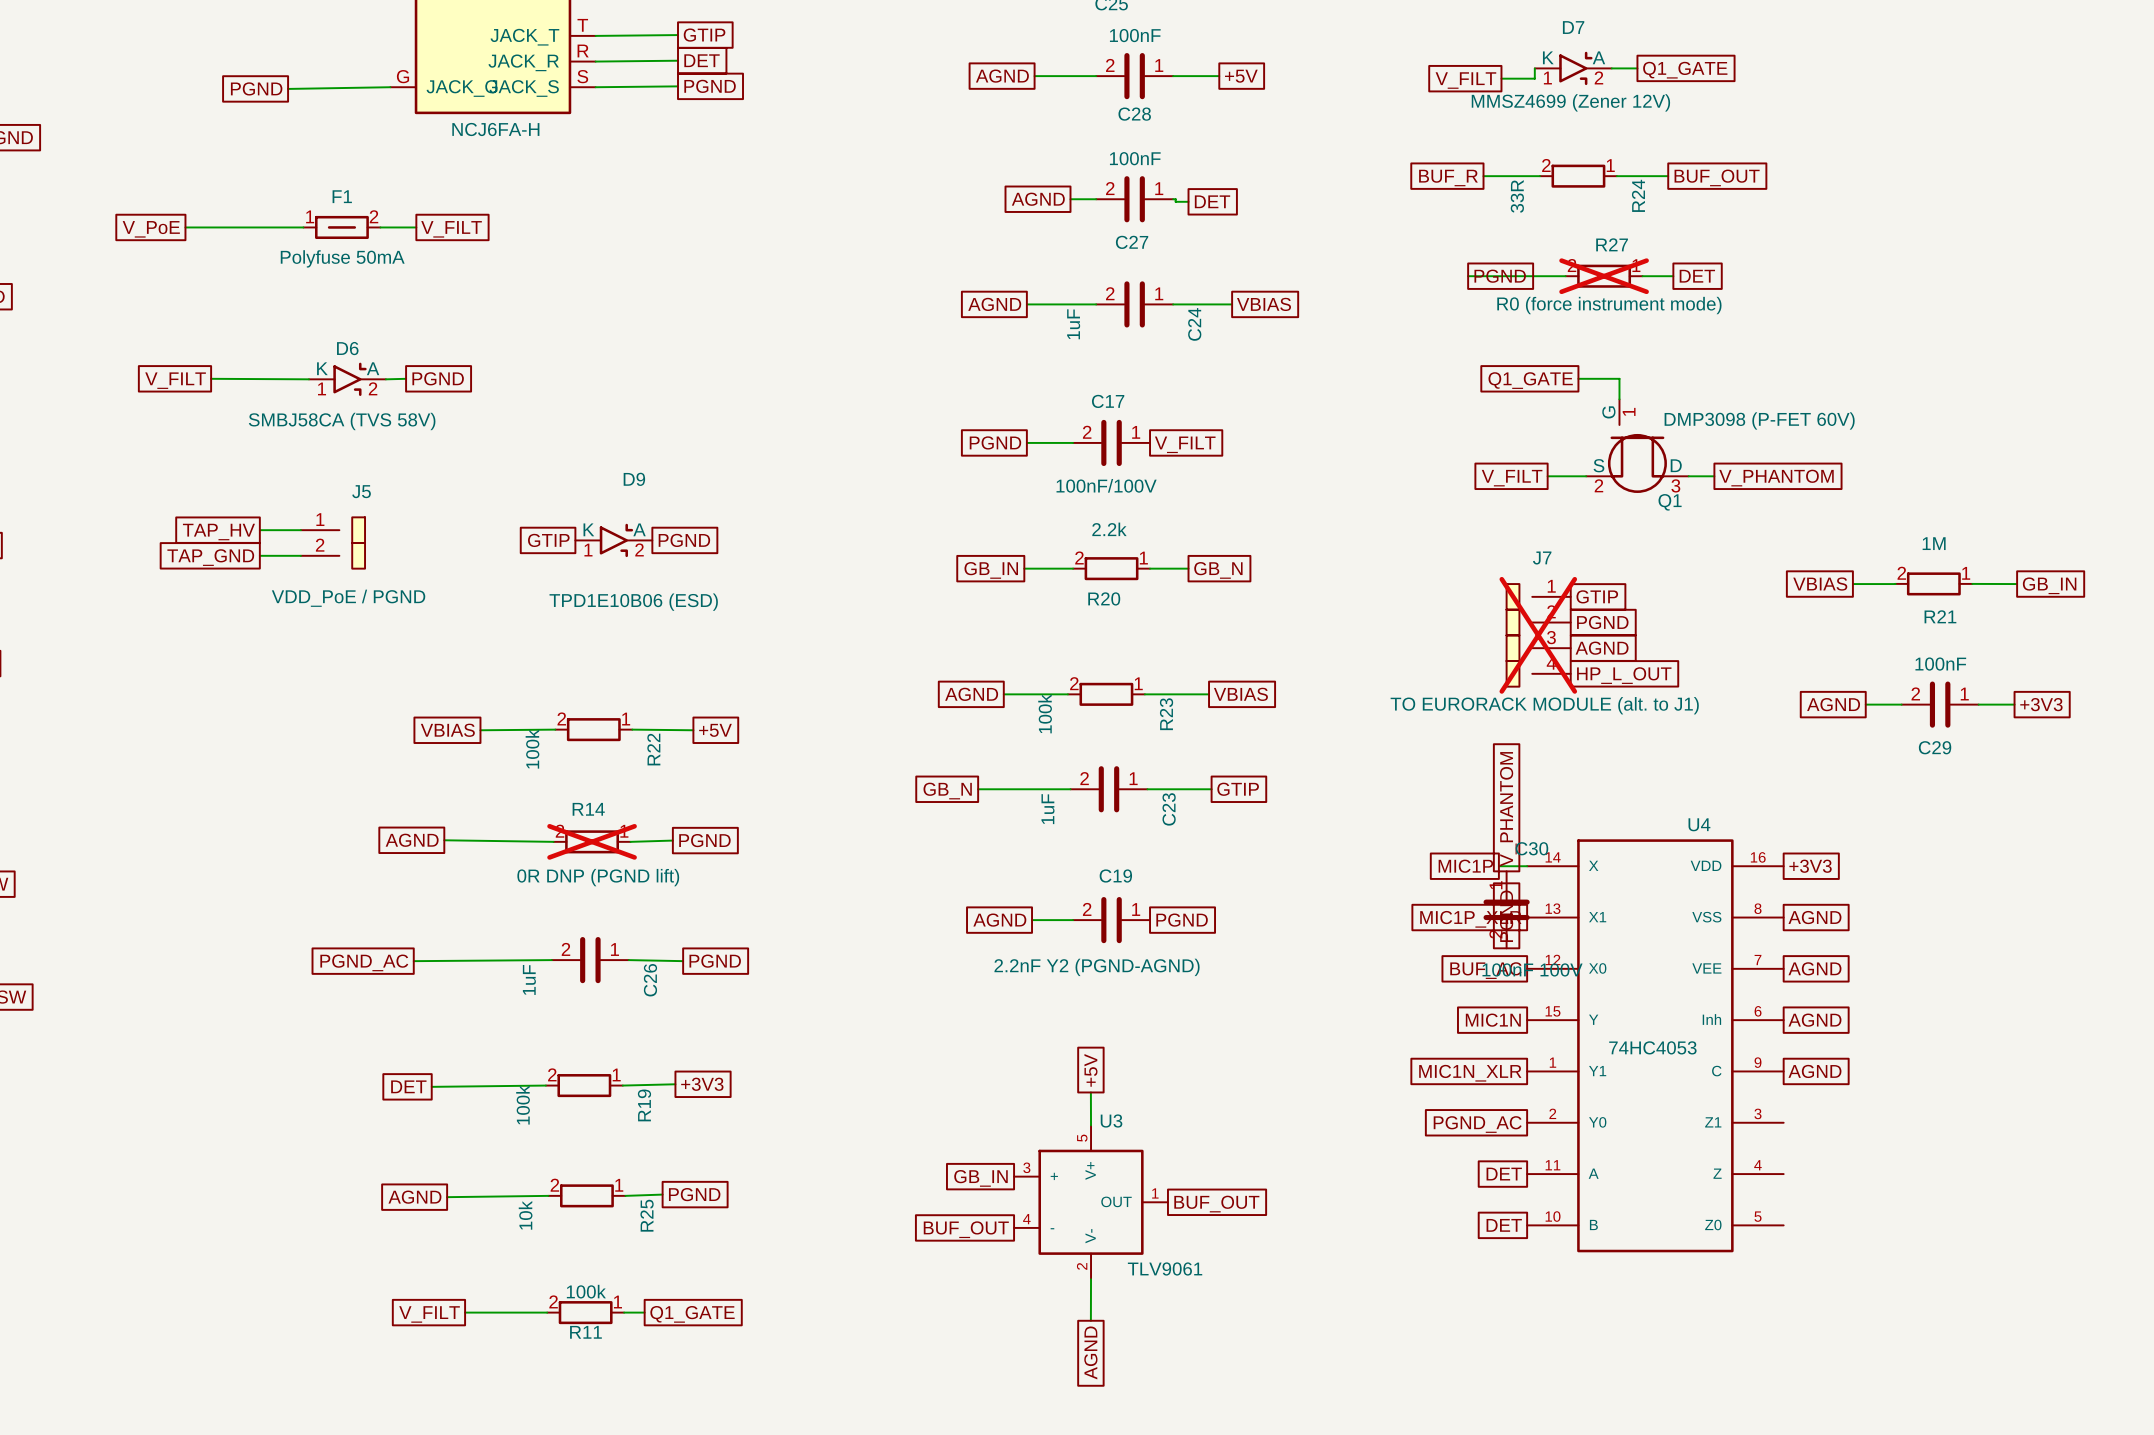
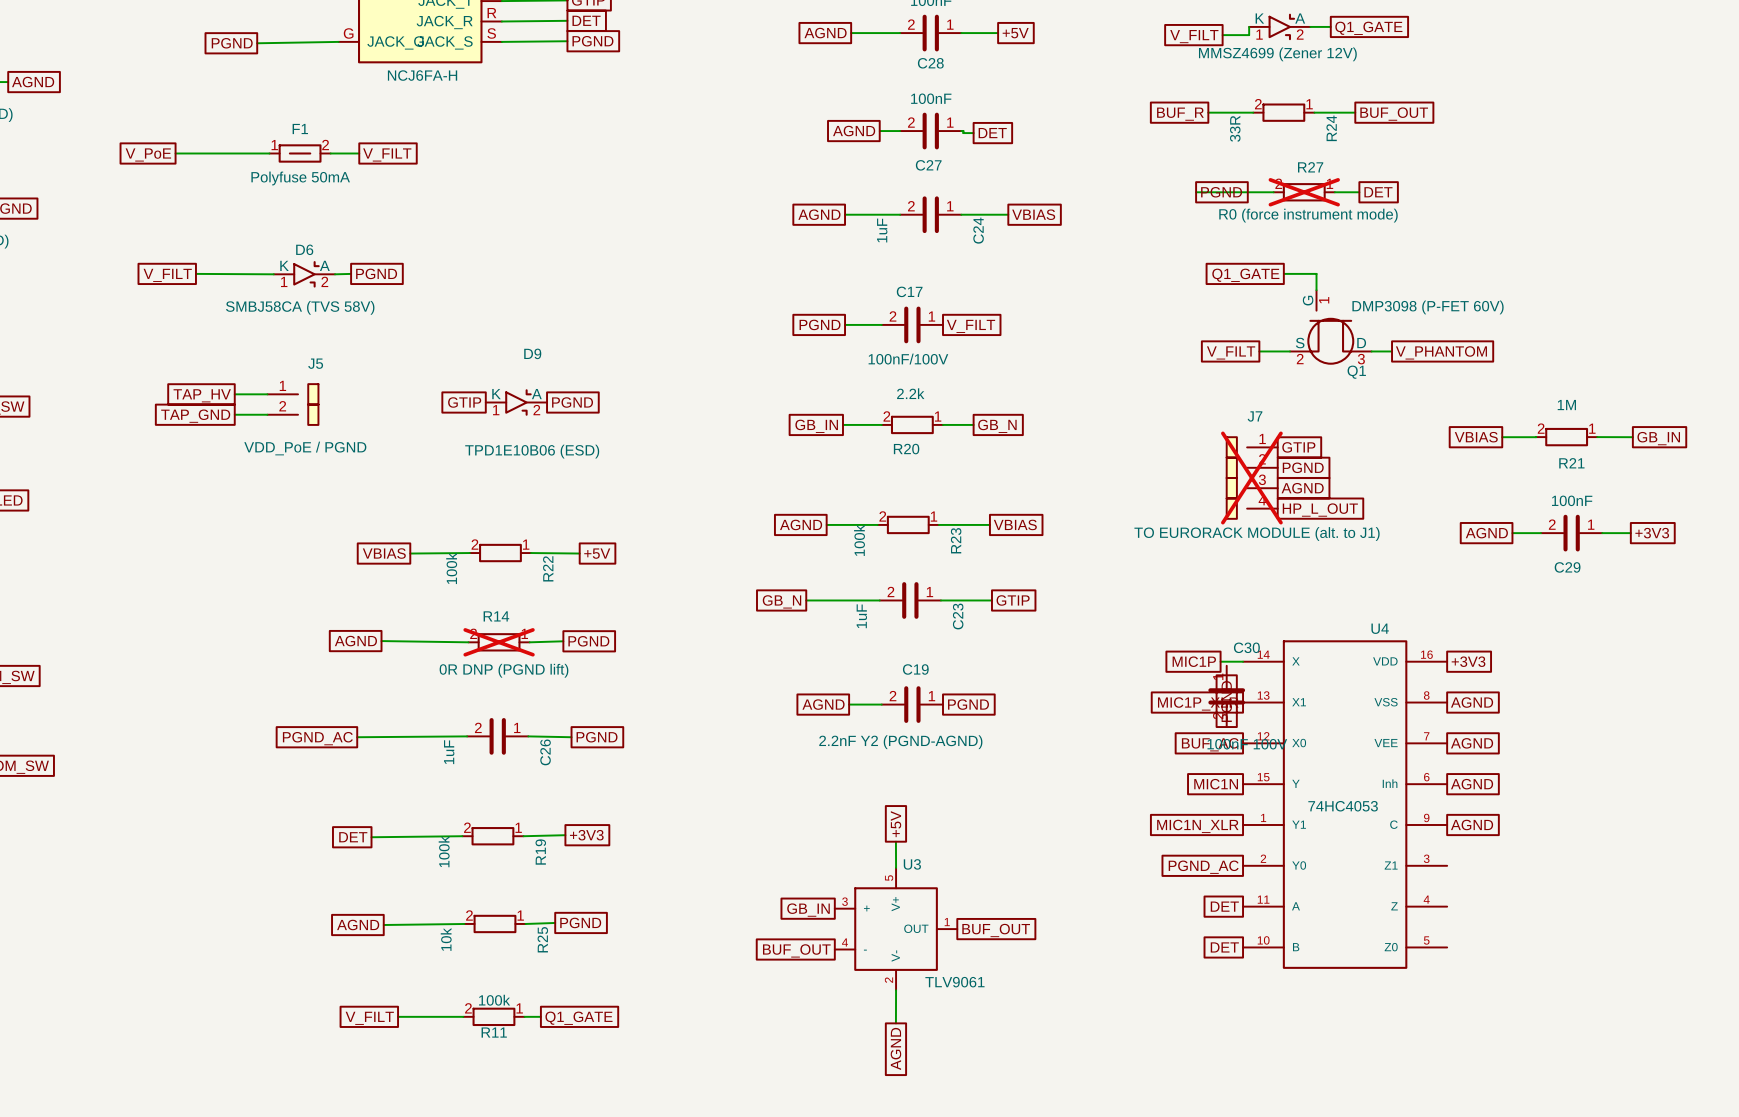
global label: V_PHANTOM (1508, 809) -> none

